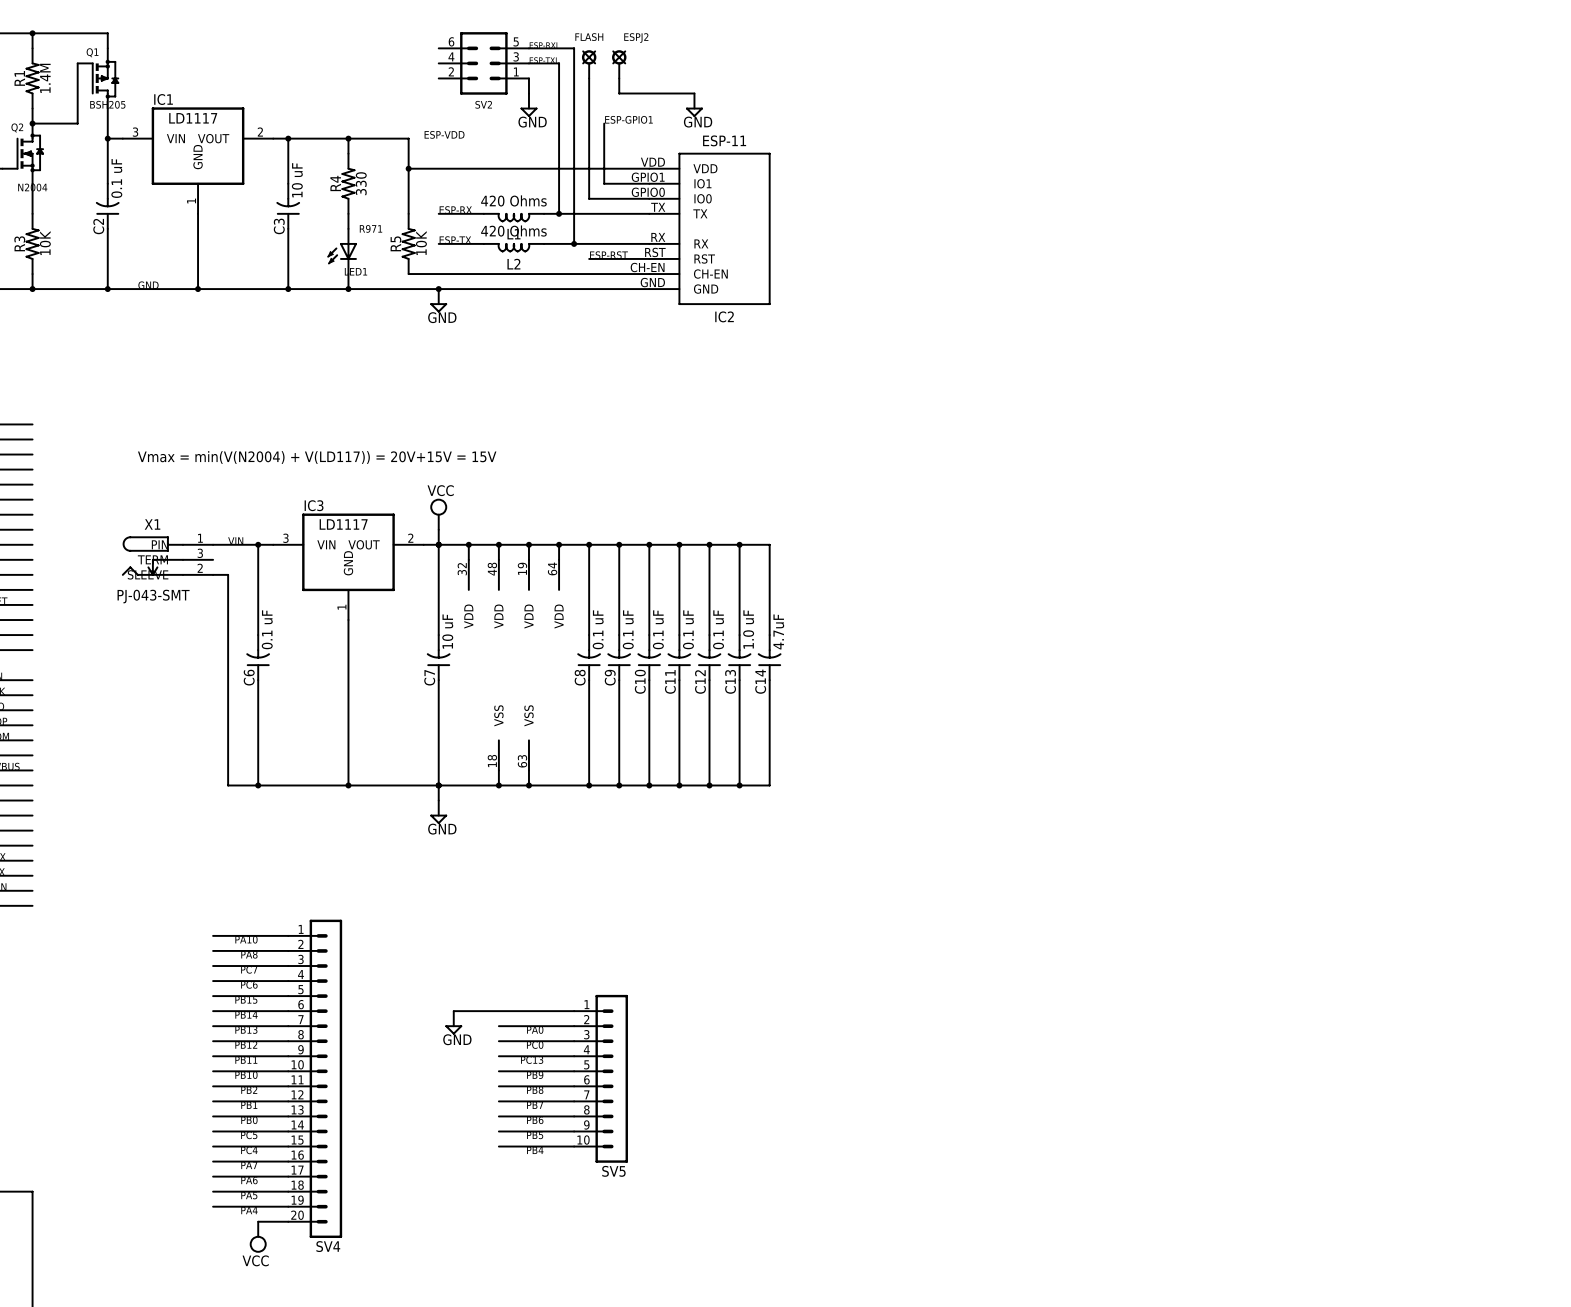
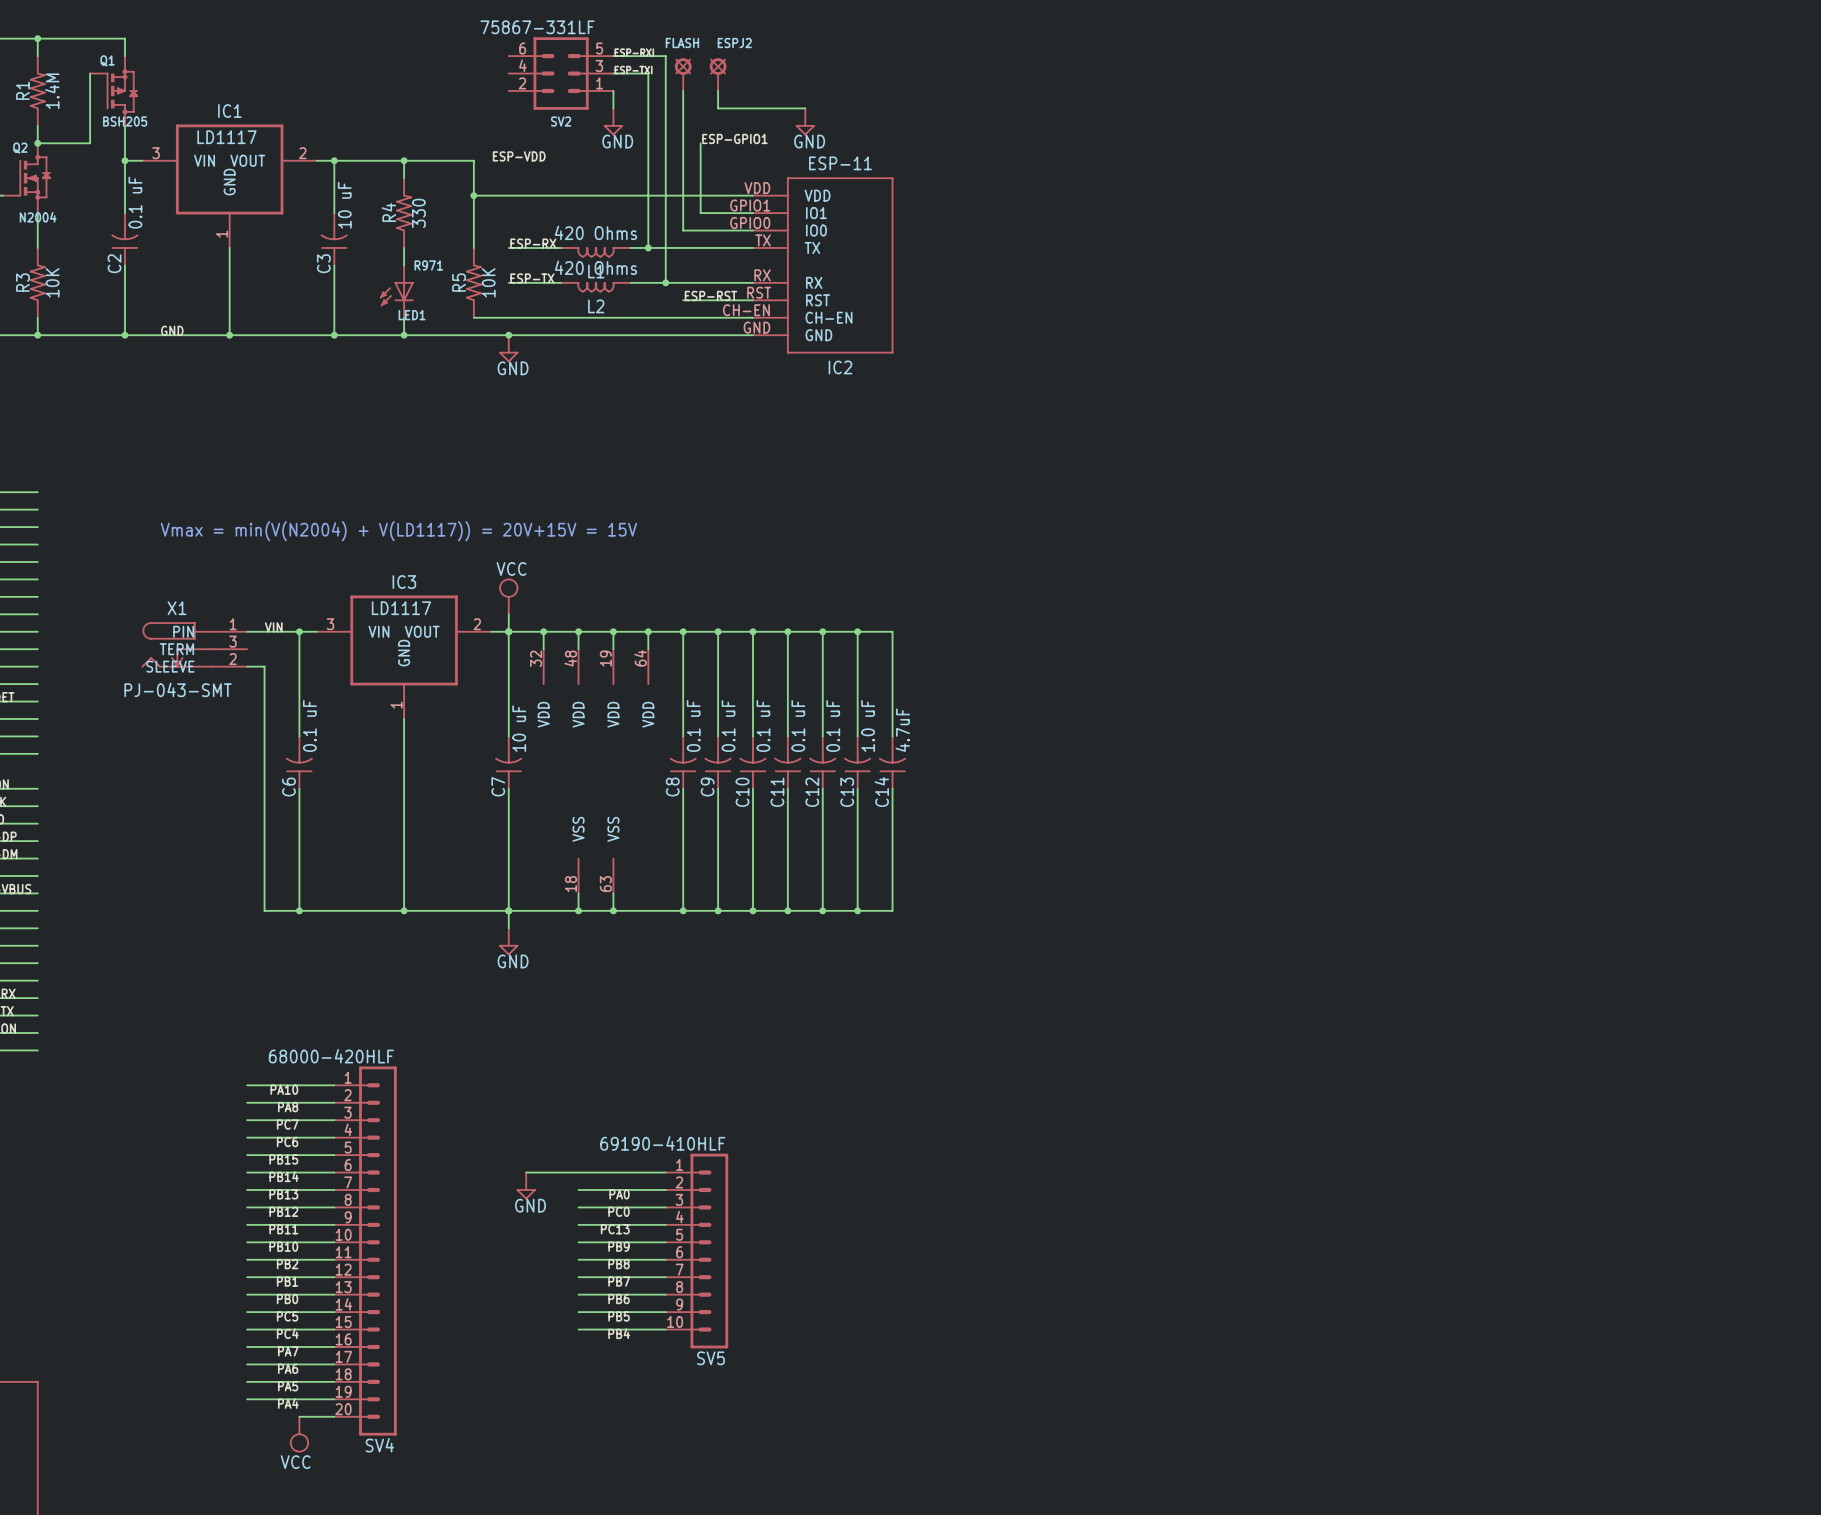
SV2 value: none -> 75867-331LF (537, 27)
IC1 name position: IC1 (163, 99) -> IC1 (229, 111)
text: Vmax = min(V(N2004) + V(LD117)) = 20V+15V = 15V (317, 457) -> Vmax = min(V(N2004) + V(LD1117)) = 20V+15V = 15V (398, 531)
IC3 name position: IC3 (314, 505) -> IC3 (404, 582)
SV4 value: none -> 68000-420HLF (331, 1056)
SV5 value: none -> 69190-410HLF (662, 1143)

